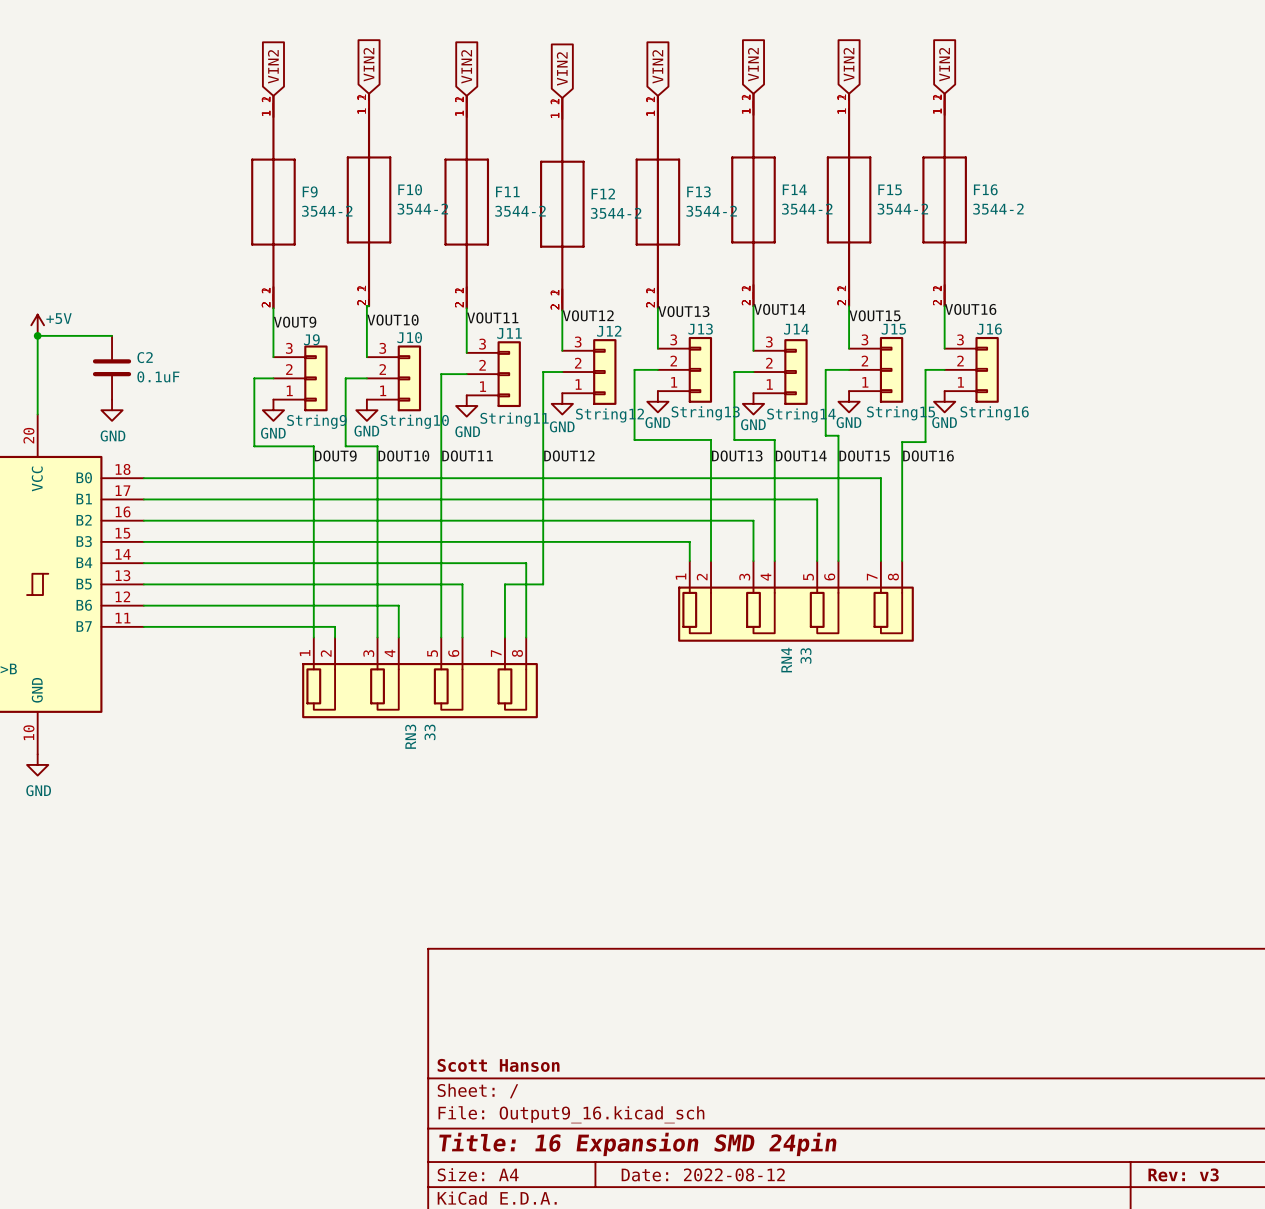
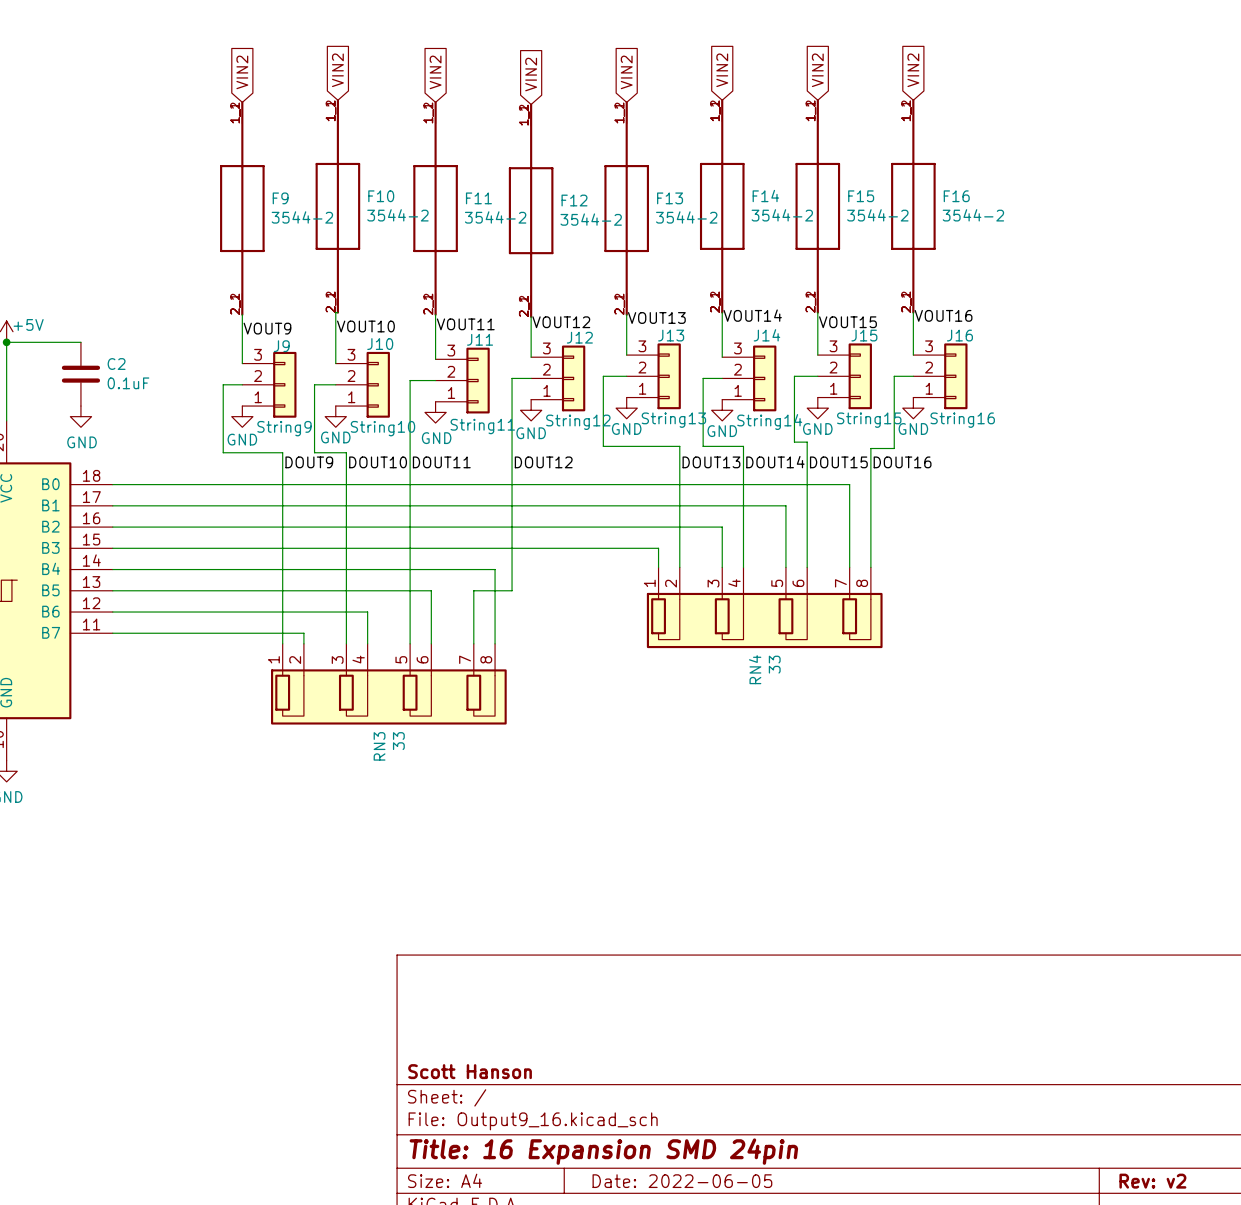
title block: Date: 2022-08-12 (703, 1174) -> Date: 2022-06-05 (682, 1181)
title block: Rev: v3 (1183, 1174) -> Rev: v2 (1152, 1181)

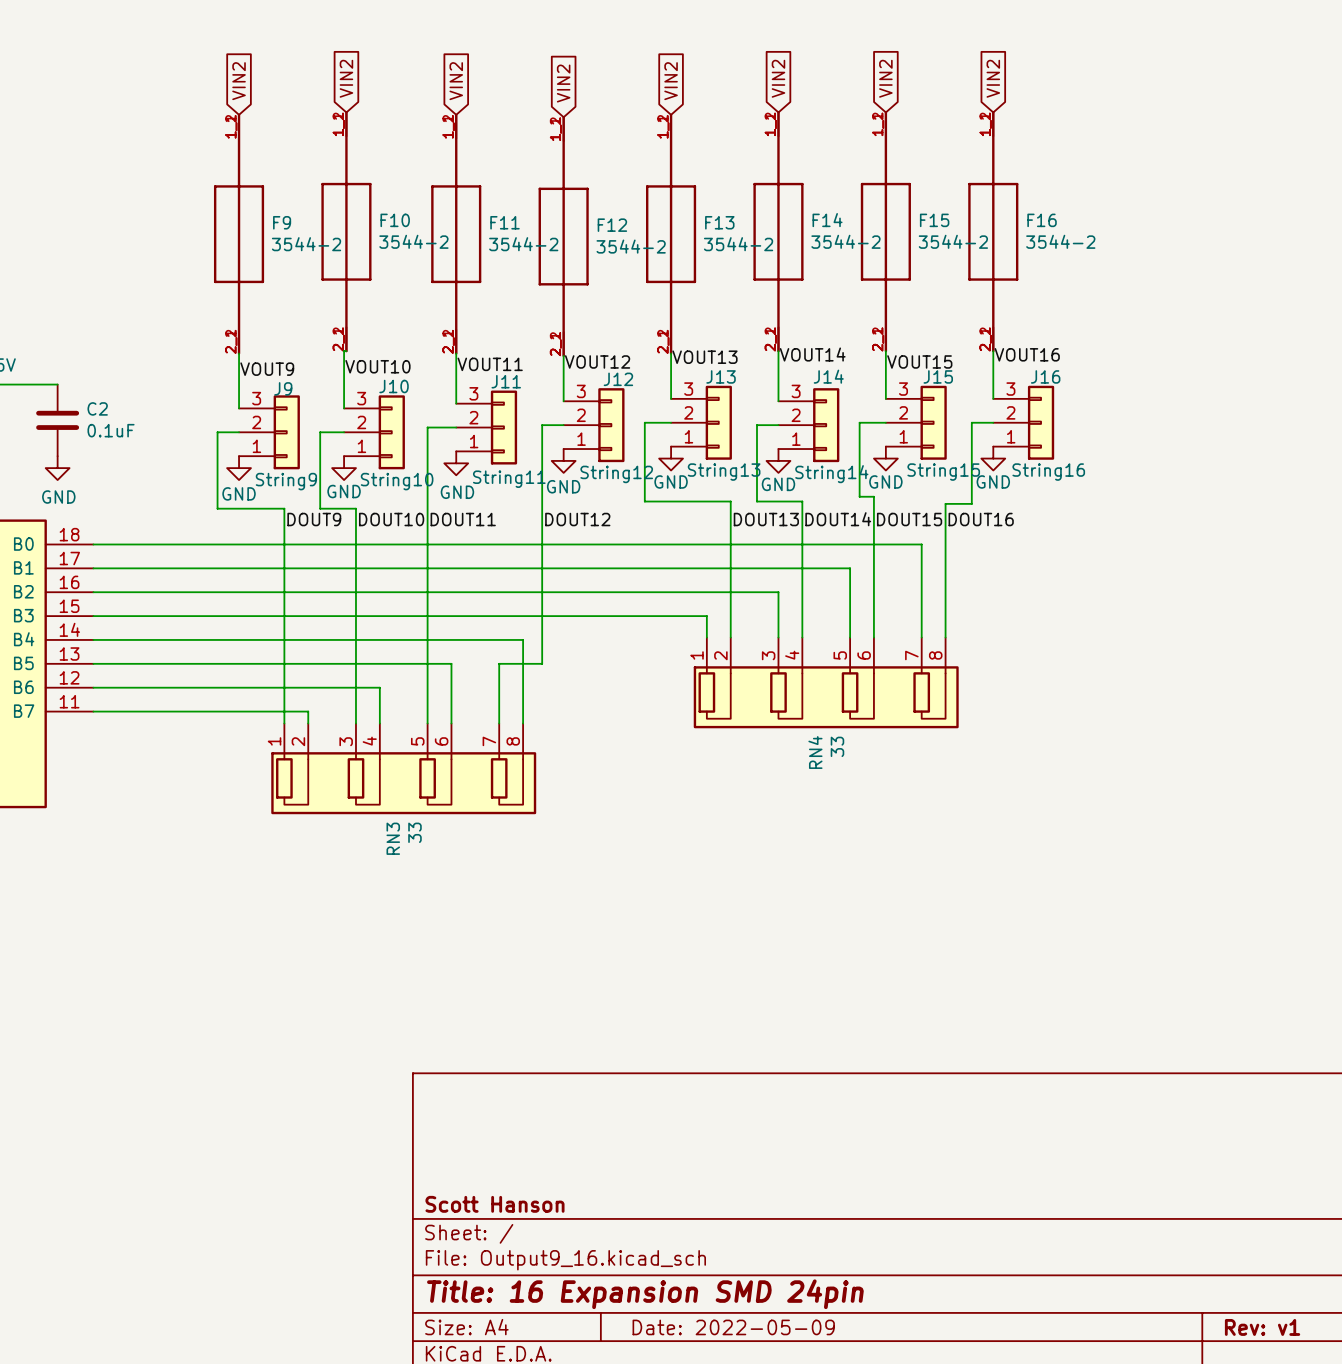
title block: Date: 2022-06-05 (682, 1181) -> Date: 2022-05-09 (733, 1327)
title block: Rev: v2 (1152, 1181) -> Rev: v1 (1262, 1327)

